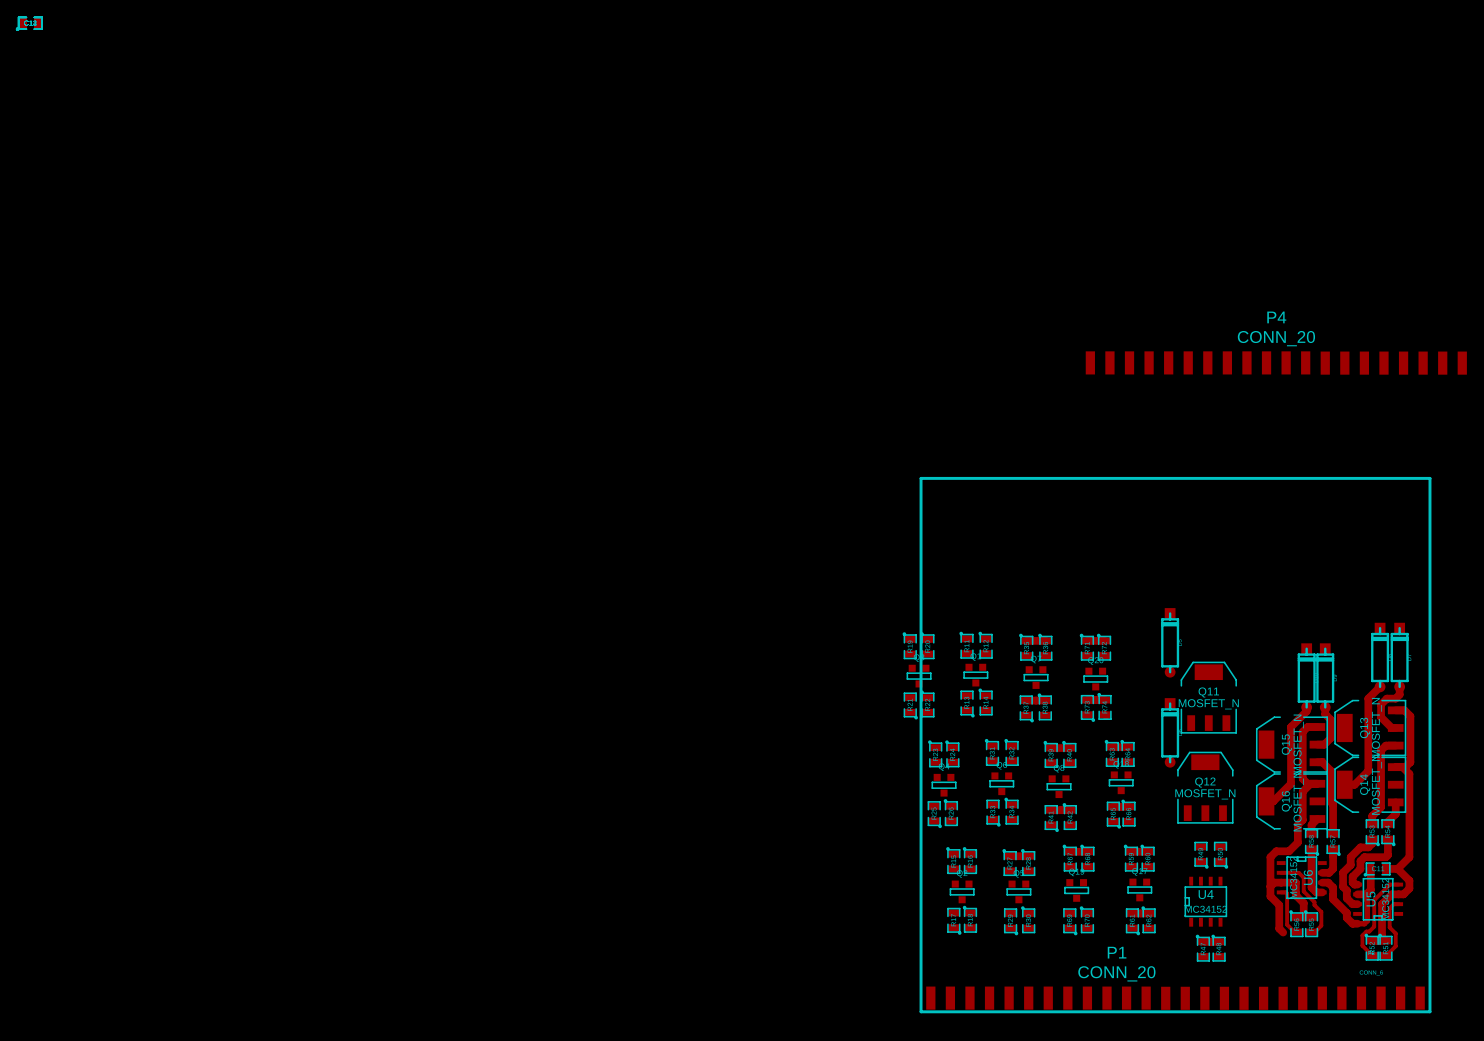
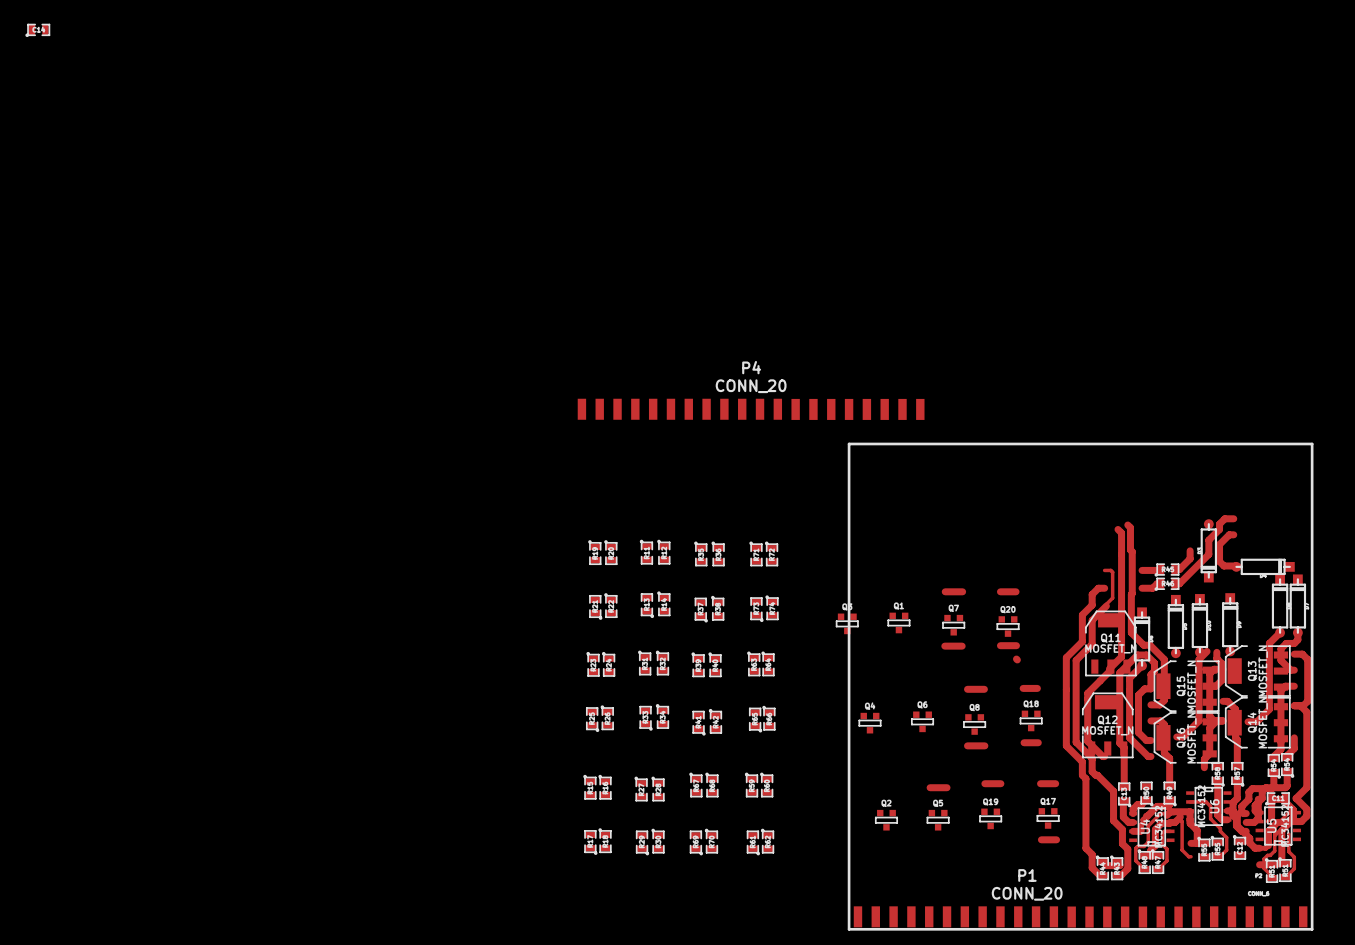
part rotation: 0° (29, 23) -> 90° clockwise (1239, 847)
part position: (29, 23) -> (1239, 847)
part rotation: 0° (29, 23) -> 90° counterclockwise (1124, 794)
part position: (29, 23) -> (1124, 794)
P4 position: (1276, 363) -> (751, 409)
track: none -> (1233, 518) (1224, 518) (1219, 524) (1219, 529) (1208, 540) (1208, 554) (1179, 583) (1174, 583)
track: none -> (1127, 525) (1130, 527) (1130, 549) (1132, 551) (1131, 632) (1143, 645) (1150, 645) (1164, 659) (1164, 700) (1159, 704) (1150, 704)
track: none -> (1118, 529) (1121, 533) (1121, 656) (1087, 693) (1087, 741) (1104, 756)
track: none -> (1233, 534) (1229, 534) (1219, 544) (1219, 561) (1223, 565) (1236, 566)
track: none -> (1190, 550) (1190, 558) (1179, 569) (1174, 569)
part: none -> (1208, 550)
part: none -> (1263, 566)
track: none -> (1161, 569) (1142, 570)
part: none -> (1166, 569)
track: none -> (1104, 570) (1112, 572) (1112, 598) (1092, 620) (1092, 644) (1076, 660) (1076, 742) (1092, 758) (1092, 771) (1113, 791) (1113, 820) (1122, 829) (1122, 843) (1127, 849) (1127, 868) (1121, 875) (1117, 875)
track: none -> (1161, 583) (1157, 583) (1152, 588) (1142, 588)
part: none -> (1166, 584)
track: none -> (1104, 588) (1098, 588) (1092, 594) (1092, 605) (1082, 614) (1082, 641) (1066, 657) (1066, 745) (1082, 761) (1082, 775) (1085, 778) (1085, 848) (1092, 854) (1092, 867) (1099, 875) (1102, 875)
part position: (1170, 642) -> (1175, 626)
part position: (909, 645) -> (594, 552)
part position: (927, 645) -> (610, 552)
part position: (966, 645) -> (646, 552)
part position: (985, 645) -> (663, 552)
part position: (1026, 647) -> (700, 553)
part position: (1045, 647) -> (718, 553)
part position: (1086, 647) -> (756, 553)
part position: (1104, 647) -> (771, 553)
part position: (1380, 657) -> (1280, 606)
part position: (1399, 657) -> (1297, 606)
part position: (1325, 678) -> (1230, 624)
track: (1380, 686) (1368, 698) (1368, 771) (1354, 784) (1344, 784) -> (1280, 632) (1269, 643) (1269, 709) (1256, 721) (1248, 721)
track: (1399, 686) (1399, 694) (1395, 698) (1386, 698) (1381, 704) (1381, 717) (1391, 727) (1395, 727) -> (1297, 632) (1297, 639) (1294, 643) (1286, 643) (1280, 648) (1280, 660) (1290, 670) (1294, 670)
part position: (985, 702) -> (663, 603)
part position: (927, 704) -> (610, 605)
part position: (967, 704) -> (647, 605)
part position: (910, 705) -> (595, 607)
part position: (1044, 706) -> (717, 608)
part position: (1104, 706) -> (772, 607)
track: none -> (1207, 651) (1199, 659) (1199, 720) (1183, 736) (1176, 736)
track: (1306, 707) (1306, 711) (1291, 727) (1291, 783) (1273, 801) (1266, 801) -> none
part position: (1026, 708) -> (701, 610)
part position: (1087, 708) -> (756, 609)
track: (1395, 710) (1404, 710) (1410, 716) (1410, 762) (1405, 767) (1395, 767) -> (1294, 654) (1302, 654) (1307, 659) (1307, 701) (1303, 705) (1294, 705)
track: none -> (1142, 665) (1129, 678) (1129, 737) (1148, 756) (1150, 756)
track: (1317, 727) (1307, 727) (1302, 731) (1302, 778) (1307, 783) (1317, 783) -> (1223, 669) (1214, 669) (1209, 673) (1209, 716) (1214, 720) (1223, 720)
part position: (1170, 732) -> (1142, 639)
track: none -> (1294, 686) (1285, 686) (1280, 690) (1280, 738)
track: (1395, 745) (1385, 745) (1381, 750) (1381, 807) (1372, 816) (1372, 824) -> none
part position: (991, 752) -> (644, 663)
part position: (1011, 752) -> (662, 663)
part position: (935, 753) -> (593, 664)
part position: (952, 753) -> (608, 664)
part position: (1111, 753) -> (753, 663)
part position: (1127, 753) -> (768, 663)
part position: (1050, 754) -> (698, 664)
part position: (1069, 754) -> (715, 664)
track: (1317, 762) (1322, 762) (1331, 771) (1333, 834) -> (1223, 701) (1227, 701) (1235, 709) (1237, 766)
track: none -> (1300, 705) (1306, 712) (1306, 787) (1296, 798) (1306, 809) (1306, 816) (1301, 821) (1290, 821) (1281, 830) (1281, 860) (1278, 863)
track: (1402, 767) (1409, 773) (1409, 857) (1397, 868) -> none
track: none -> (1150, 720) (1160, 720) (1164, 724) (1164, 752) (1169, 758) (1169, 786)
track: none -> (1216, 720) (1209, 728) (1209, 753)
track: (1310, 783) (1302, 791) (1302, 819) (1297, 824) (1297, 842) (1289, 851) (1276, 851) (1270, 857) (1270, 896) (1279, 905) (1279, 928) (1283, 932) -> none
track: none -> (1294, 737) (1294, 748) (1287, 757)
track: none -> (1150, 740) (1146, 740) (1138, 732) (1138, 695) (1144, 688) (1150, 688) (1150, 674) (1154, 671) (1154, 663) (1146, 655) (1137, 655) (1119, 672) (1119, 743) (1124, 747) (1124, 787)
part position: (1011, 811) -> (662, 716)
part position: (950, 812) -> (607, 717)
part position: (993, 813) -> (646, 718)
part position: (1128, 813) -> (768, 718)
part position: (934, 814) -> (592, 719)
part position: (1113, 815) -> (755, 720)
part position: (1069, 816) -> (715, 721)
part position: (1051, 818) -> (699, 723)
part: none -> (1287, 765)
part: (1372, 832) -> none
track: none -> (1287, 771) (1287, 785) (1285, 787) (1265, 787) (1262, 791) (1262, 798) (1255, 805) (1255, 810) (1259, 812)
track: (1372, 839) (1372, 843) (1368, 847) (1360, 847) (1350, 857) (1350, 865) (1347, 867) -> (1237, 780) (1237, 798)
part position: (1312, 842) -> (1218, 774)
part position: (1333, 842) -> (1237, 774)
track: (1311, 848) (1311, 887) (1316, 892) (1322, 892) -> (1217, 780) (1217, 815) (1222, 819) (1227, 819)
track: (1333, 848) (1333, 868) (1329, 872) (1322, 872) -> none
part position: (1201, 855) -> (1170, 793)
part position: (1221, 855) -> (1146, 793)
part position: (1069, 858) -> (695, 785)
part position: (1087, 858) -> (711, 785)
part position: (1130, 858) -> (751, 785)
part position: (1147, 858) -> (766, 785)
part position: (953, 860) -> (589, 787)
part position: (969, 860) -> (605, 787)
part position: (1009, 862) -> (641, 789)
part position: (1028, 862) -> (658, 789)
track: none -> (1146, 799) (1133, 809) (1133, 813)
track: none -> (1169, 799) (1167, 806) (1157, 806) (1142, 819) (1140, 831) (1133, 831)
part position: (1377, 869) -> (1277, 798)
track: none -> (1124, 800) (1123, 817) (1128, 822) (1133, 822)
track: (1281, 872) (1298, 872) (1303, 877) (1303, 891) (1321, 911) (1321, 925) (1314, 932) (1311, 932) -> (1190, 801) (1206, 801) (1210, 806) (1210, 818) (1226, 837) (1226, 850) (1220, 855) (1217, 855)
U6 position: (1301, 877) -> (1208, 806)
track: (1322, 882) (1328, 882) (1333, 887) (1333, 899) (1346, 912) (1346, 917) (1352, 923) (1364, 923) (1367, 920) (1366, 894) -> none
track: none -> (1296, 812) (1288, 812) (1274, 826) (1274, 850) (1264, 858) (1264, 868) (1272, 877)
track: none -> (1170, 813) (1160, 813) (1148, 826) (1148, 842) (1143, 846) (1135, 848) (1135, 860) (1144, 869)
track: (1398, 884) (1389, 884) (1385, 888) -> (1271, 798) (1271, 817)
track: none -> (1180, 817) (1174, 822) (1161, 823) (1155, 829) (1155, 845) (1150, 850) (1150, 855)
track: (1381, 893) (1374, 900) (1374, 926) (1362, 935) (1362, 945) (1372, 955) -> none
U5 position: (1378, 899) -> (1278, 826)
U4 rotation: 0° (1205, 901) -> 90° counterclockwise (1151, 826)
U4 position: (1205, 901) -> (1151, 826)
track: none -> (1170, 831) (1162, 833) (1162, 844) (1166, 849) (1166, 860) (1158, 869)
track: (1389, 908) (1389, 927) (1395, 933) (1395, 946) (1385, 955) -> (1288, 834) (1288, 851) (1294, 857) (1294, 868) (1285, 877)
part position: (969, 919) -> (605, 840)
part position: (1028, 919) -> (658, 841)
part position: (1086, 919) -> (711, 841)
part position: (1148, 919) -> (767, 841)
track: (1382, 919) (1382, 936) (1378, 940) -> (1268, 845) (1265, 848) (1255, 848) (1249, 842) (1249, 838) (1237, 826) (1237, 815) (1232, 810) (1227, 810)
part position: (954, 921) -> (590, 842)
part position: (1011, 921) -> (642, 842)
part position: (1070, 921) -> (696, 842)
part position: (1132, 921) -> (753, 842)
part: none -> (1217, 848)
part: (1296, 923) -> none
part: none -> (1102, 867)
part: none -> (1116, 867)
part: none -> (1284, 869)
part: (1371, 947) -> none
part position: (1202, 948) -> (1157, 861)
part position: (1218, 948) -> (1144, 861)

